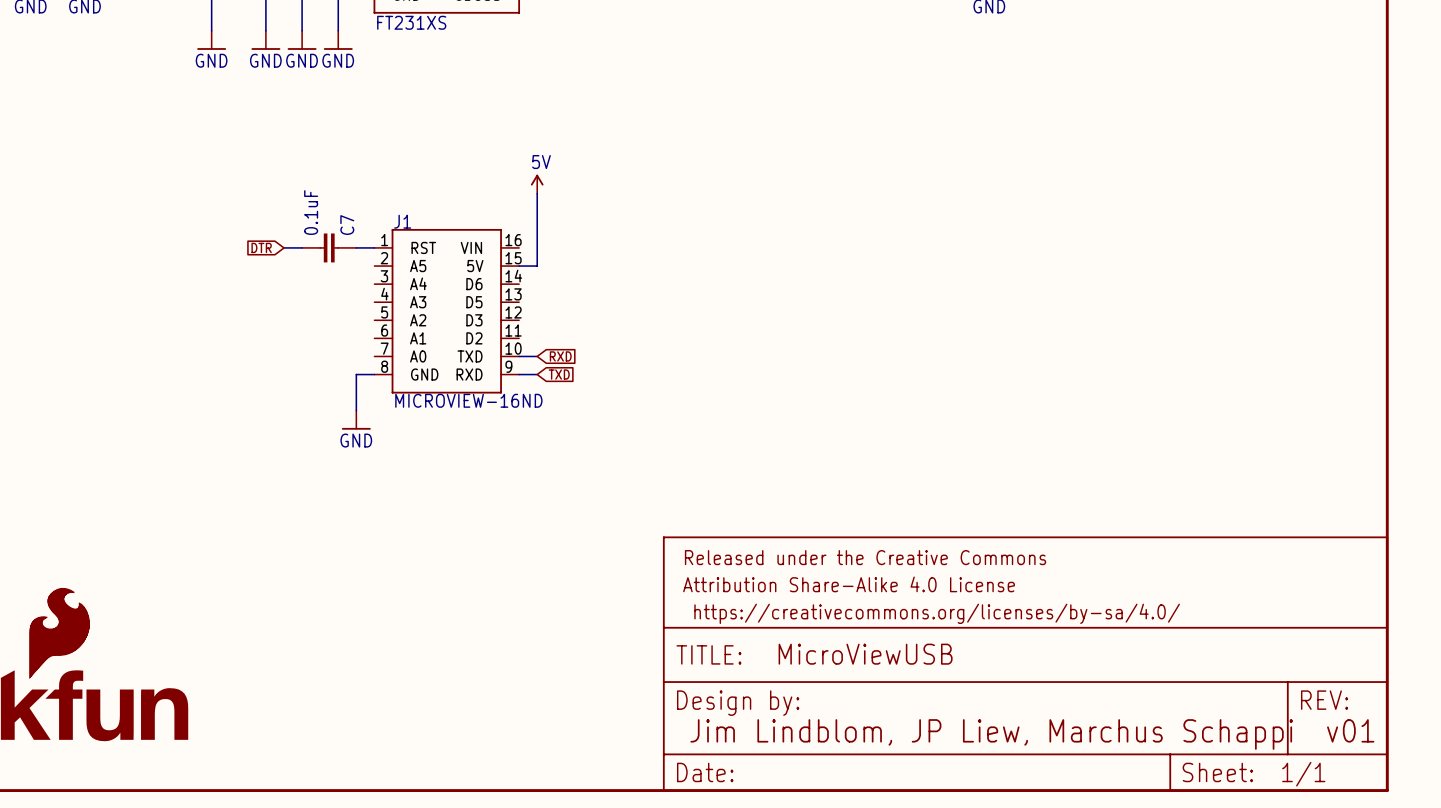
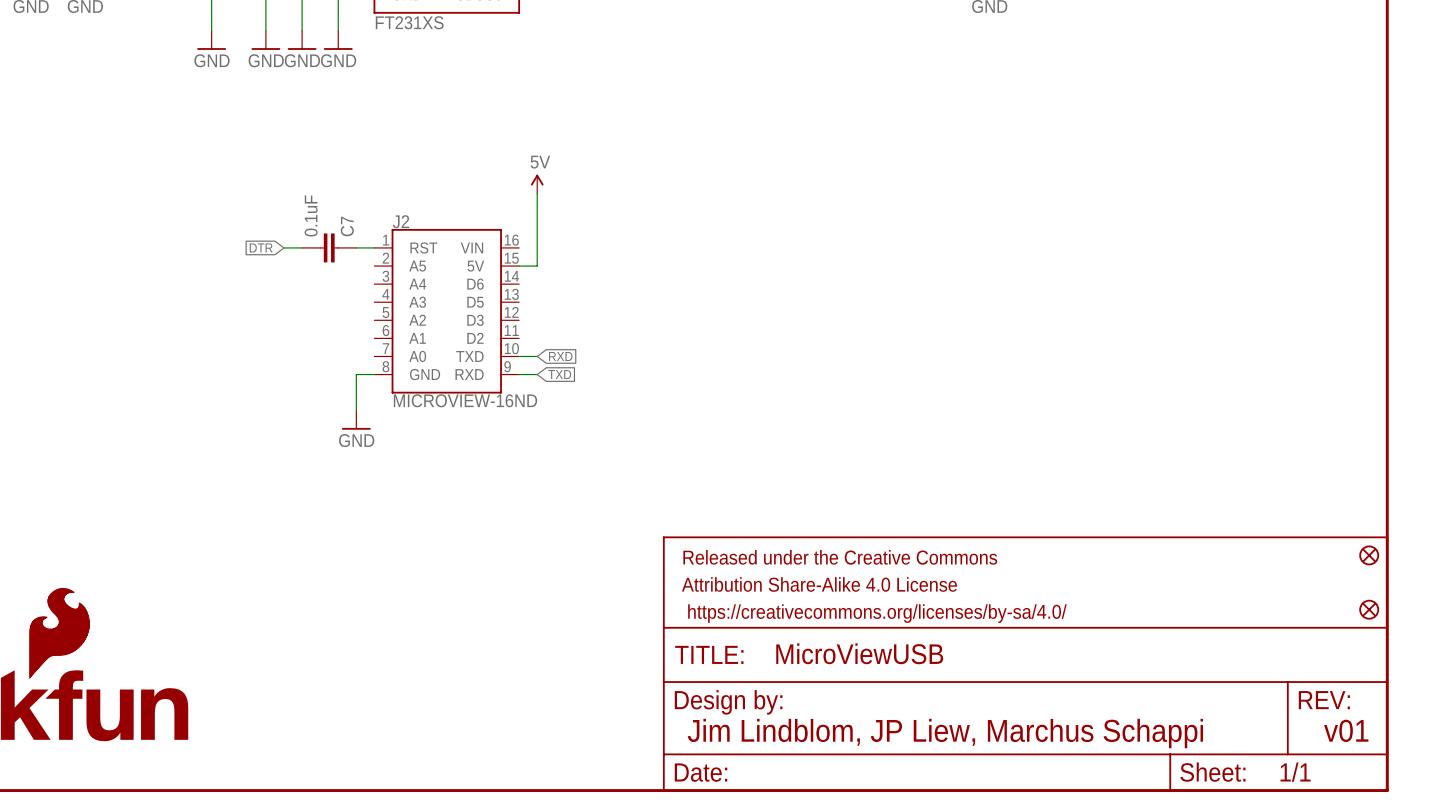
J1 name: J1 (402, 221) -> J2 (400, 221)
part: none -> (1369, 555)
part: none -> (1369, 609)

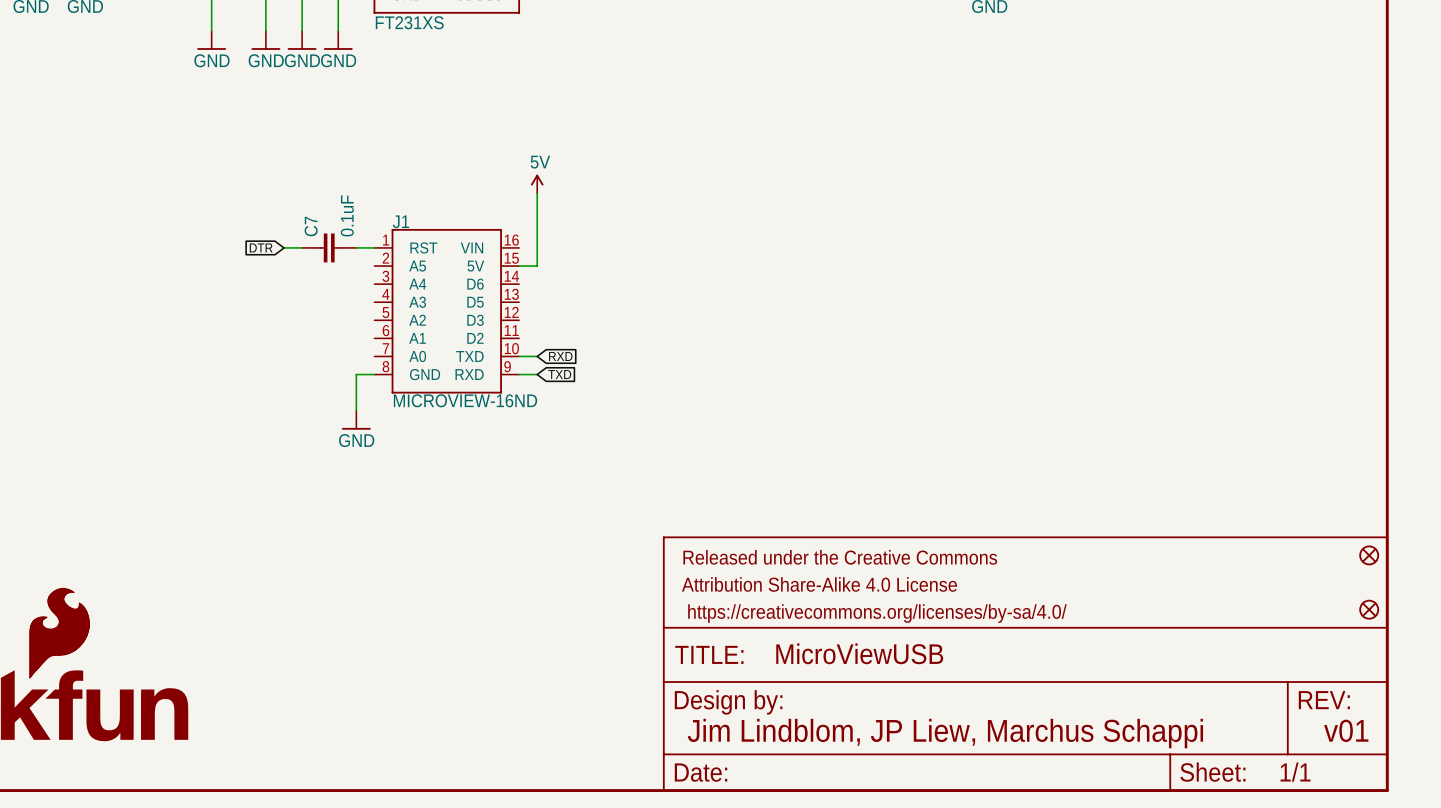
C7 value position: 0.1uF (311, 215) -> 0.1uF (347, 215)
J2 name: J2 (400, 221) -> J1 (400, 221)
C7 name position: C7 (347, 226) -> C7 (311, 226)

